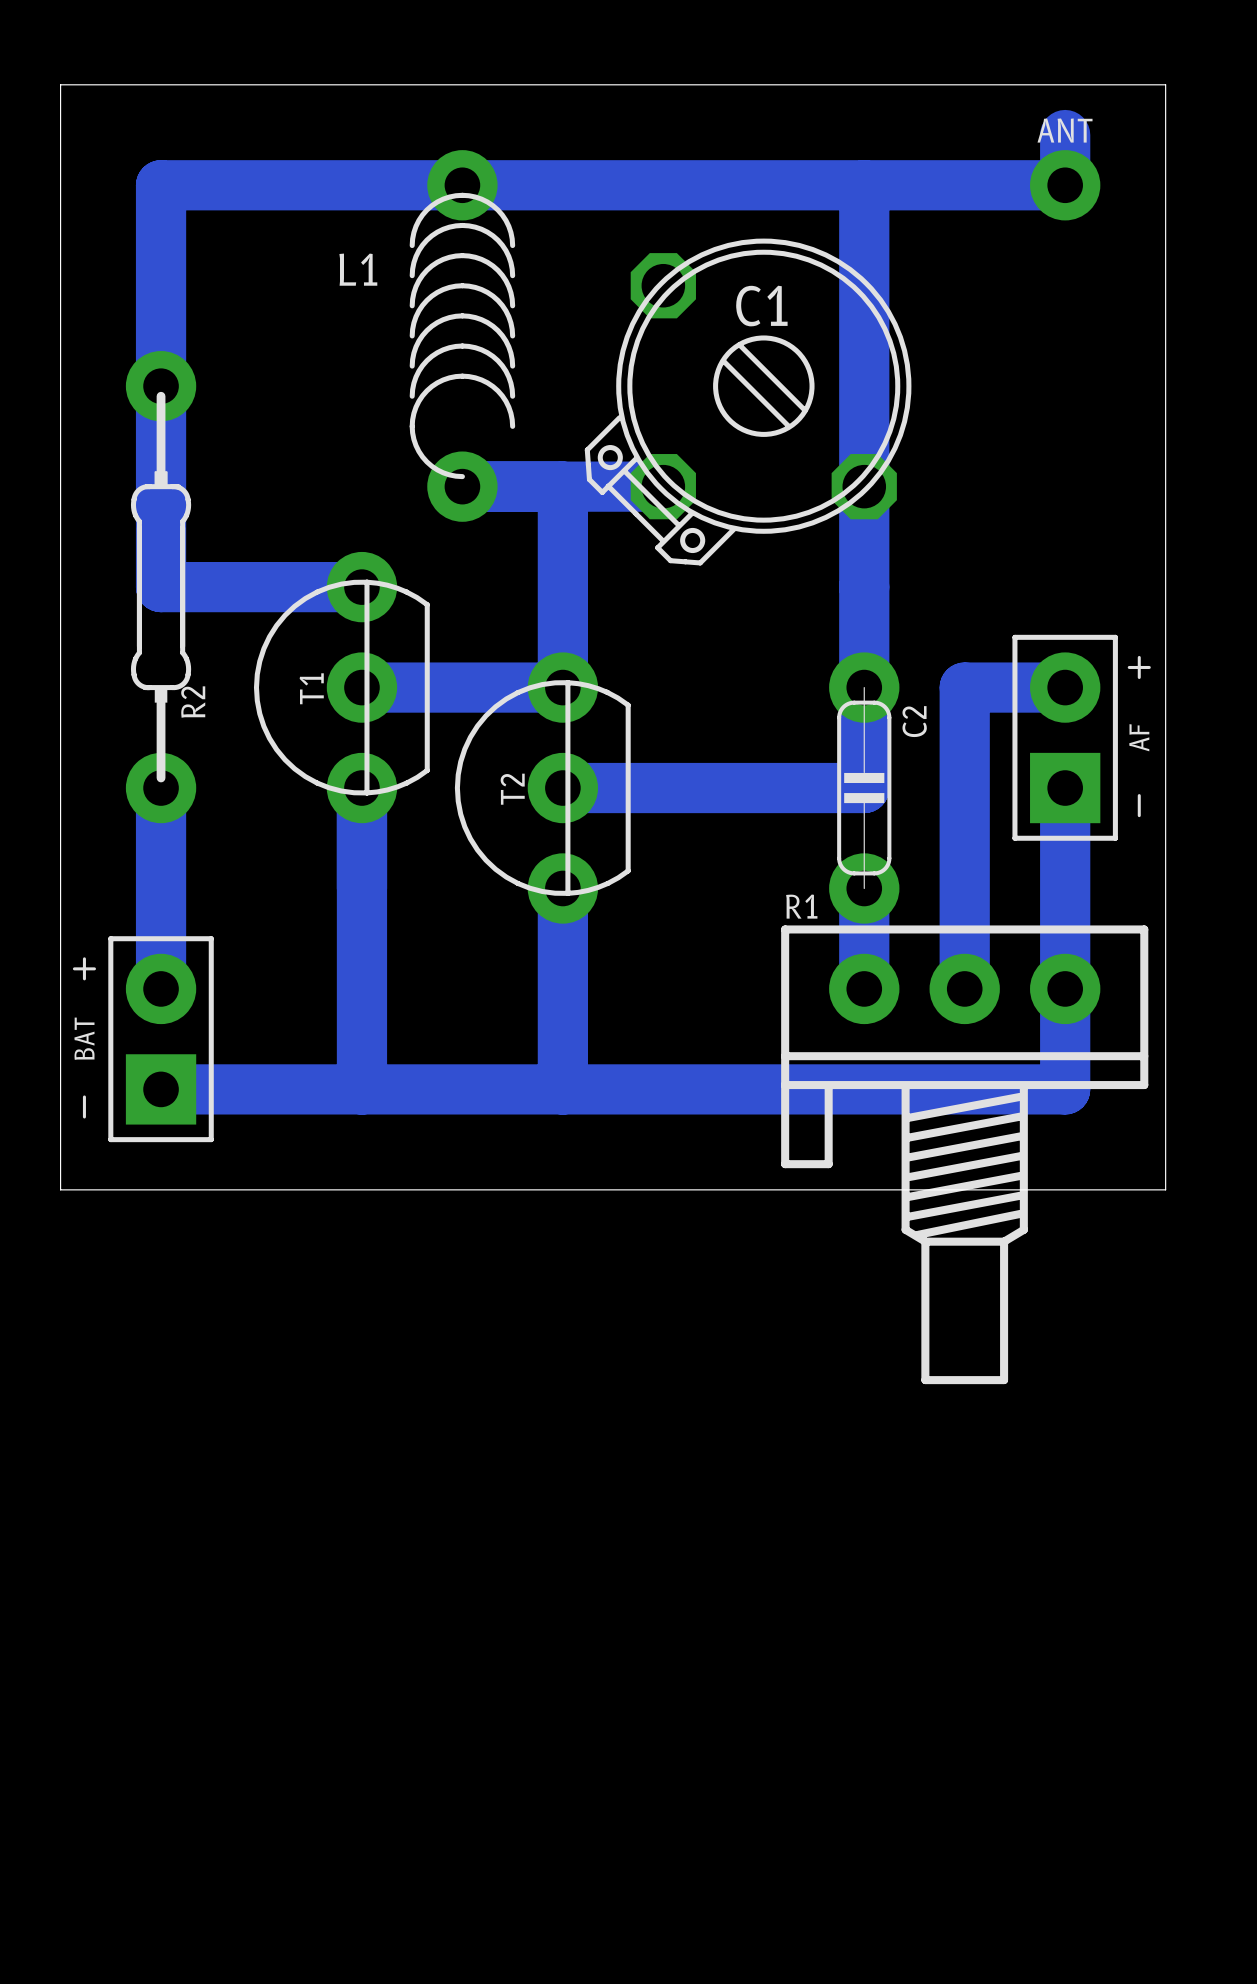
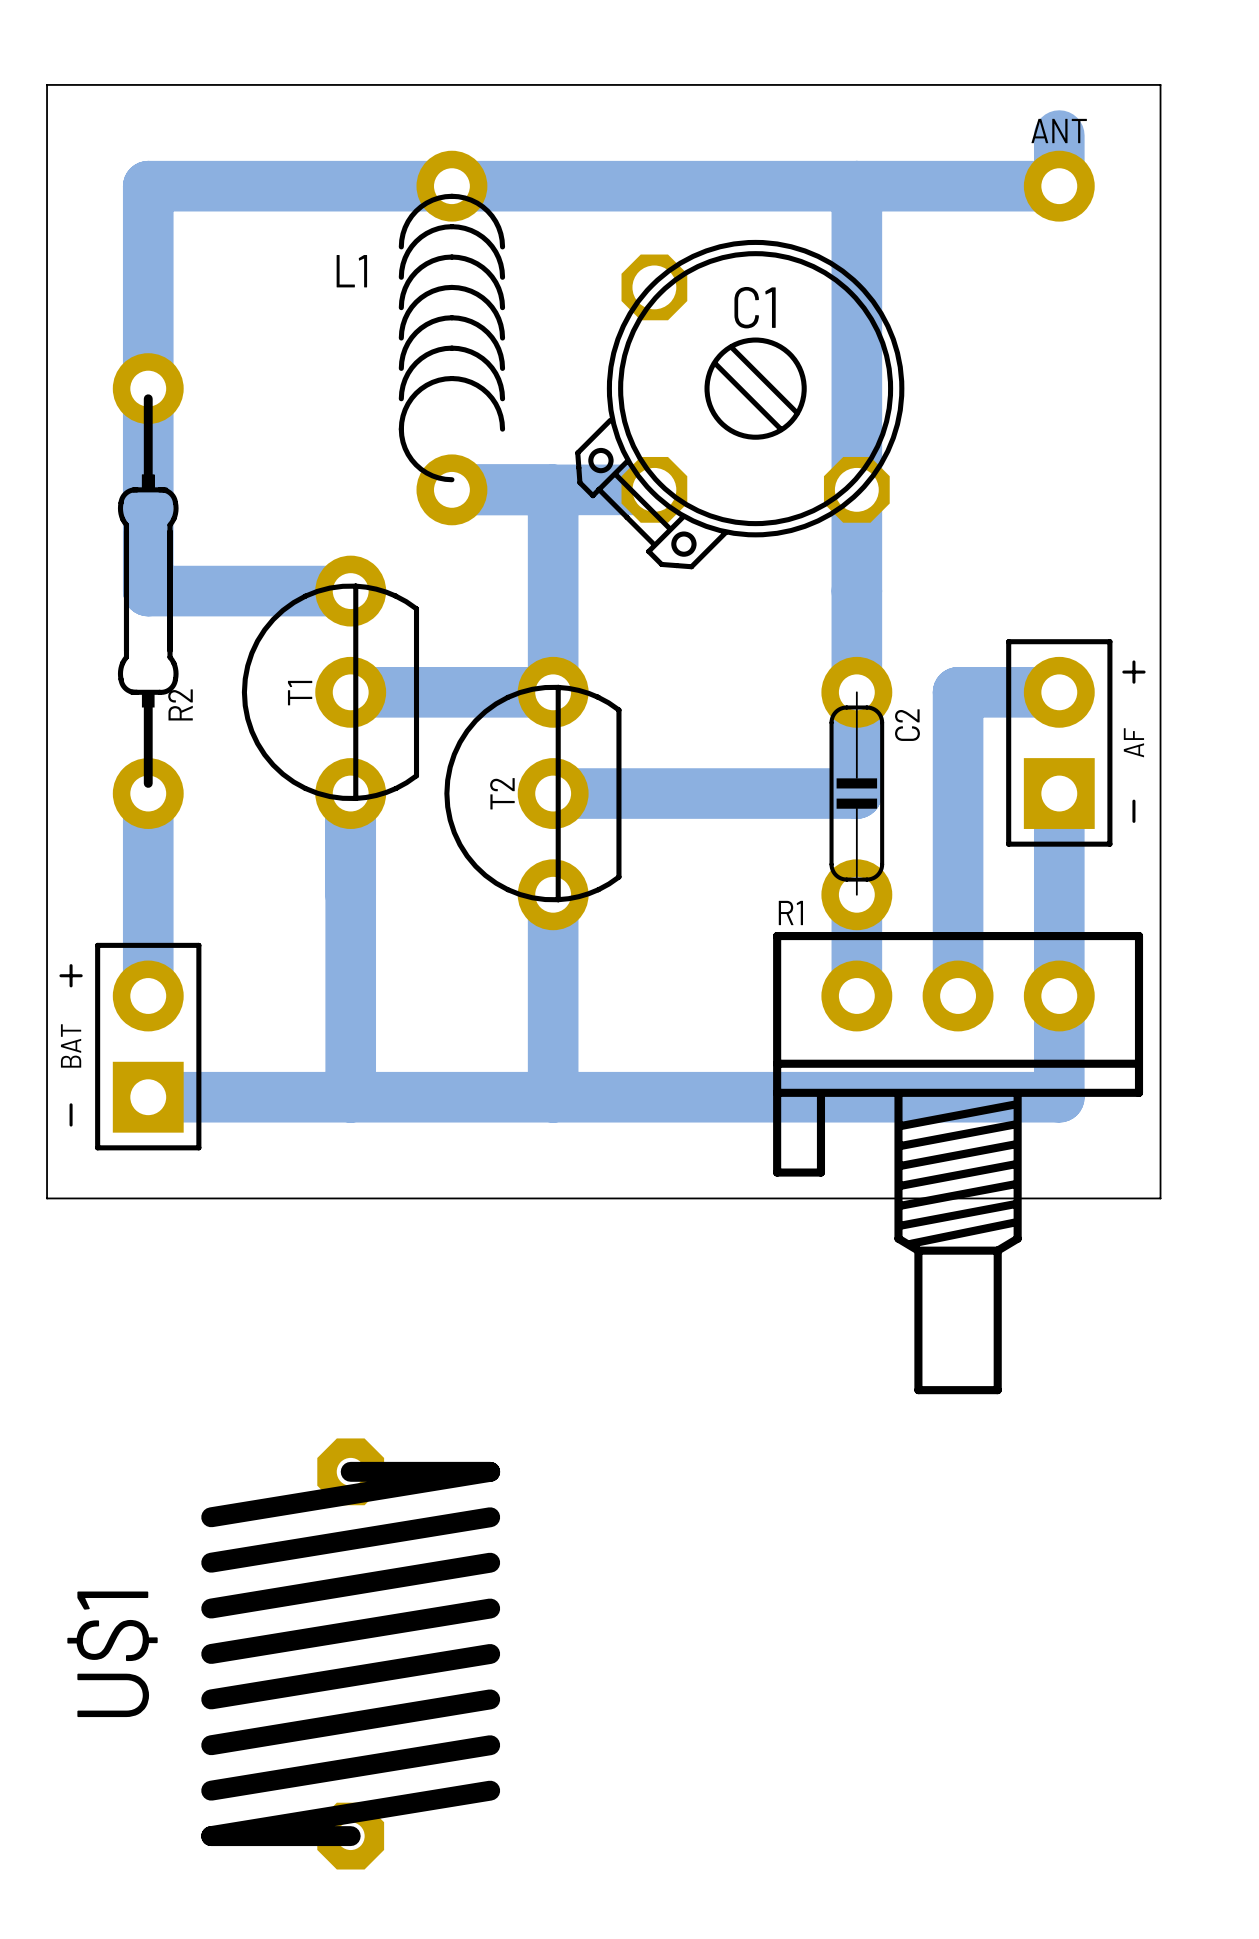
U$1: none -> (350, 1653)

